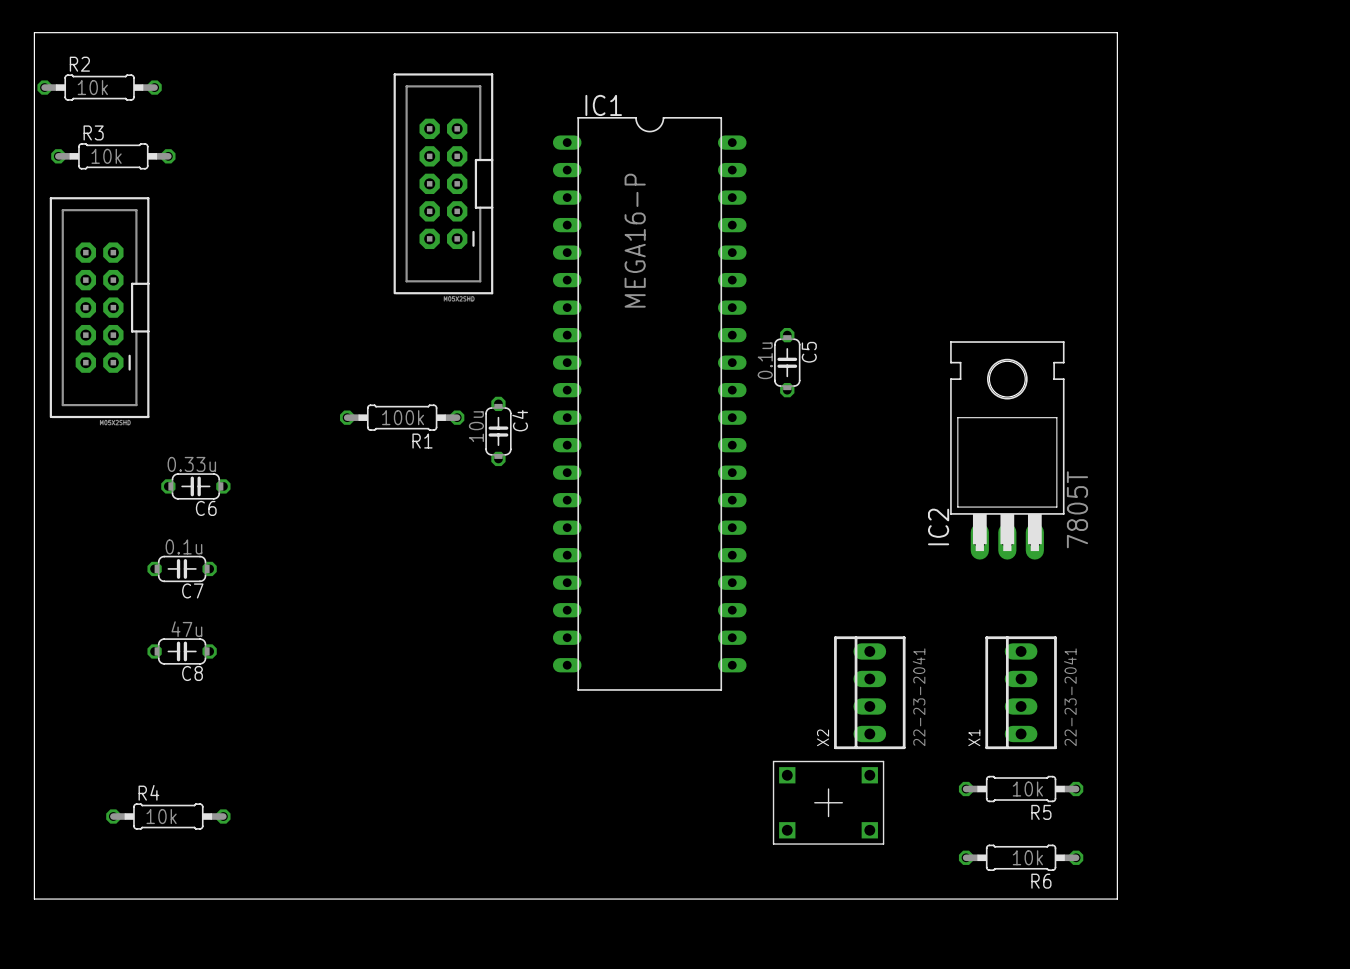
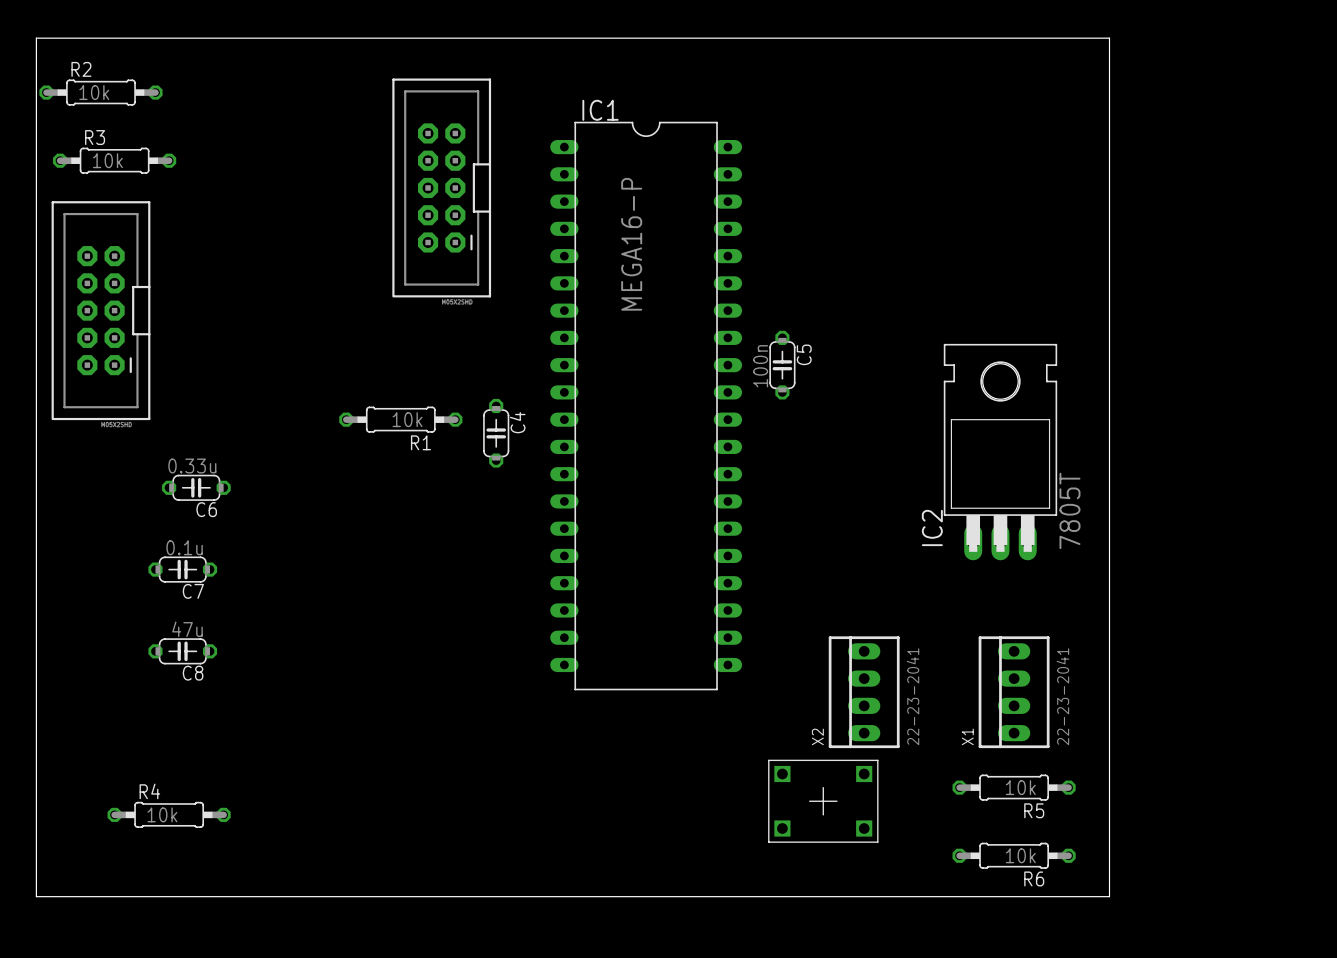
C5 value: 0.1u (765, 360) -> 100n (760, 366)
R1 value: 100k (403, 417) -> 10k (407, 419)
C4 value: 10u (476, 426) -> none

